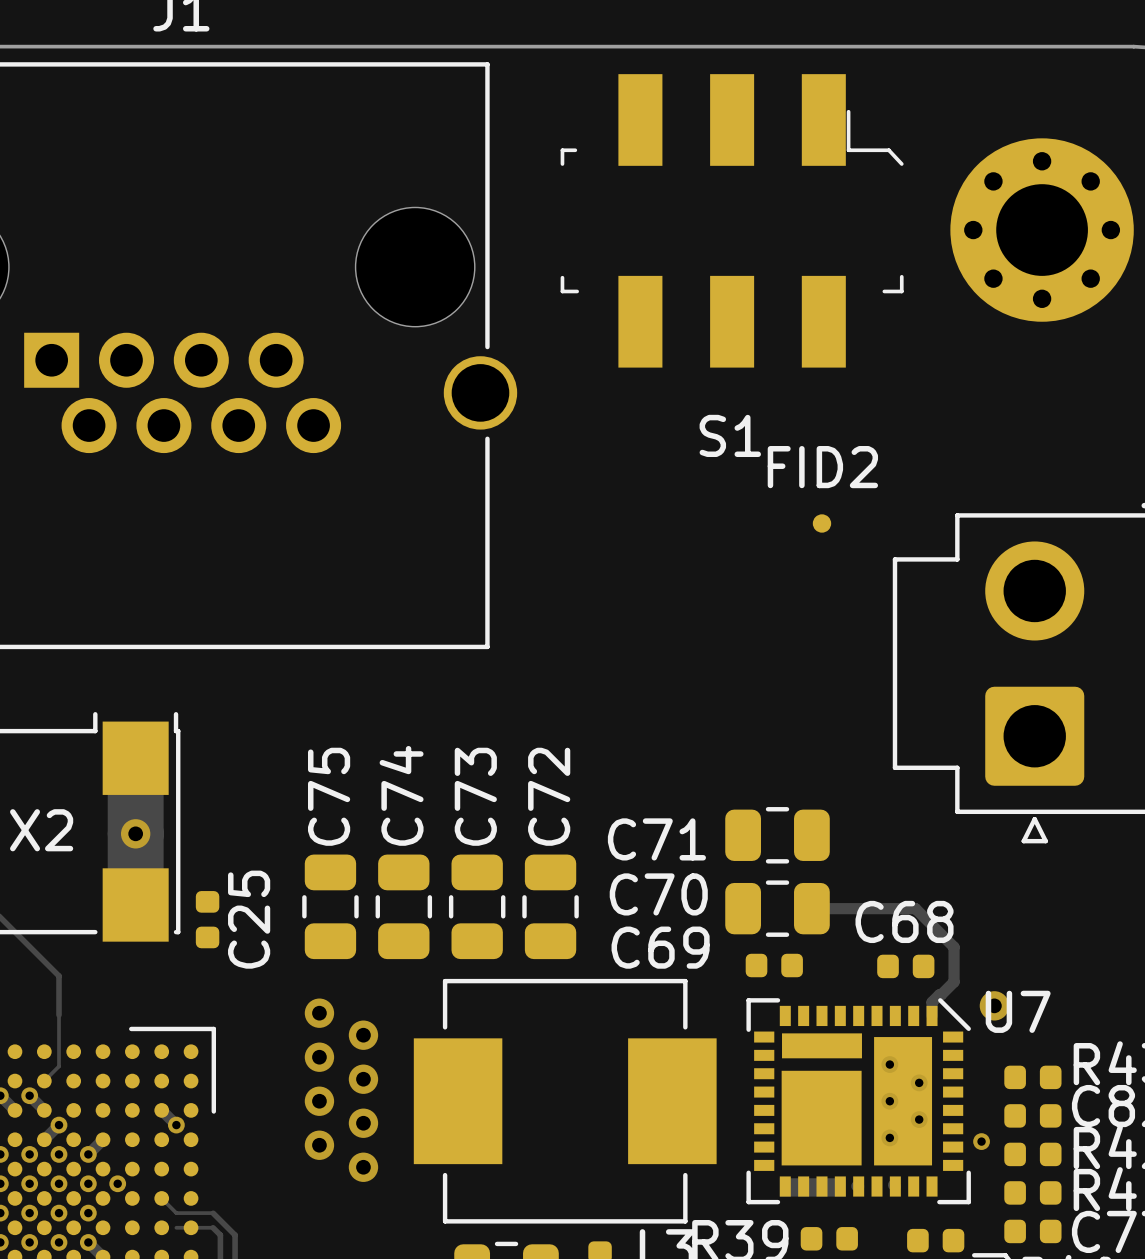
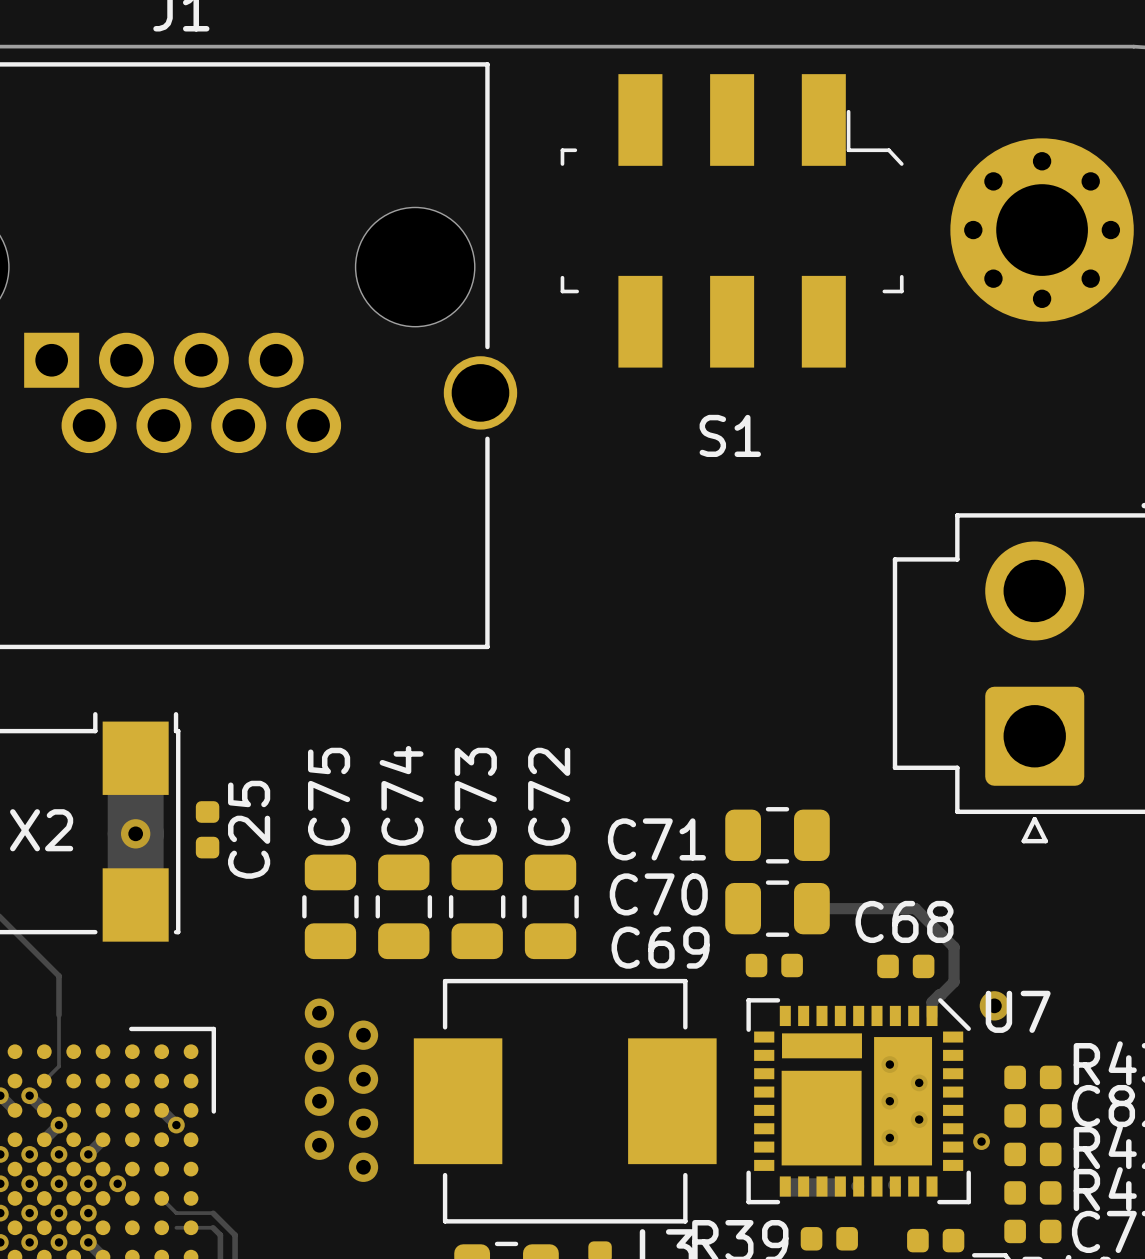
FID2: (821, 523) -> none
C25 position: (207, 919) -> (207, 829)

